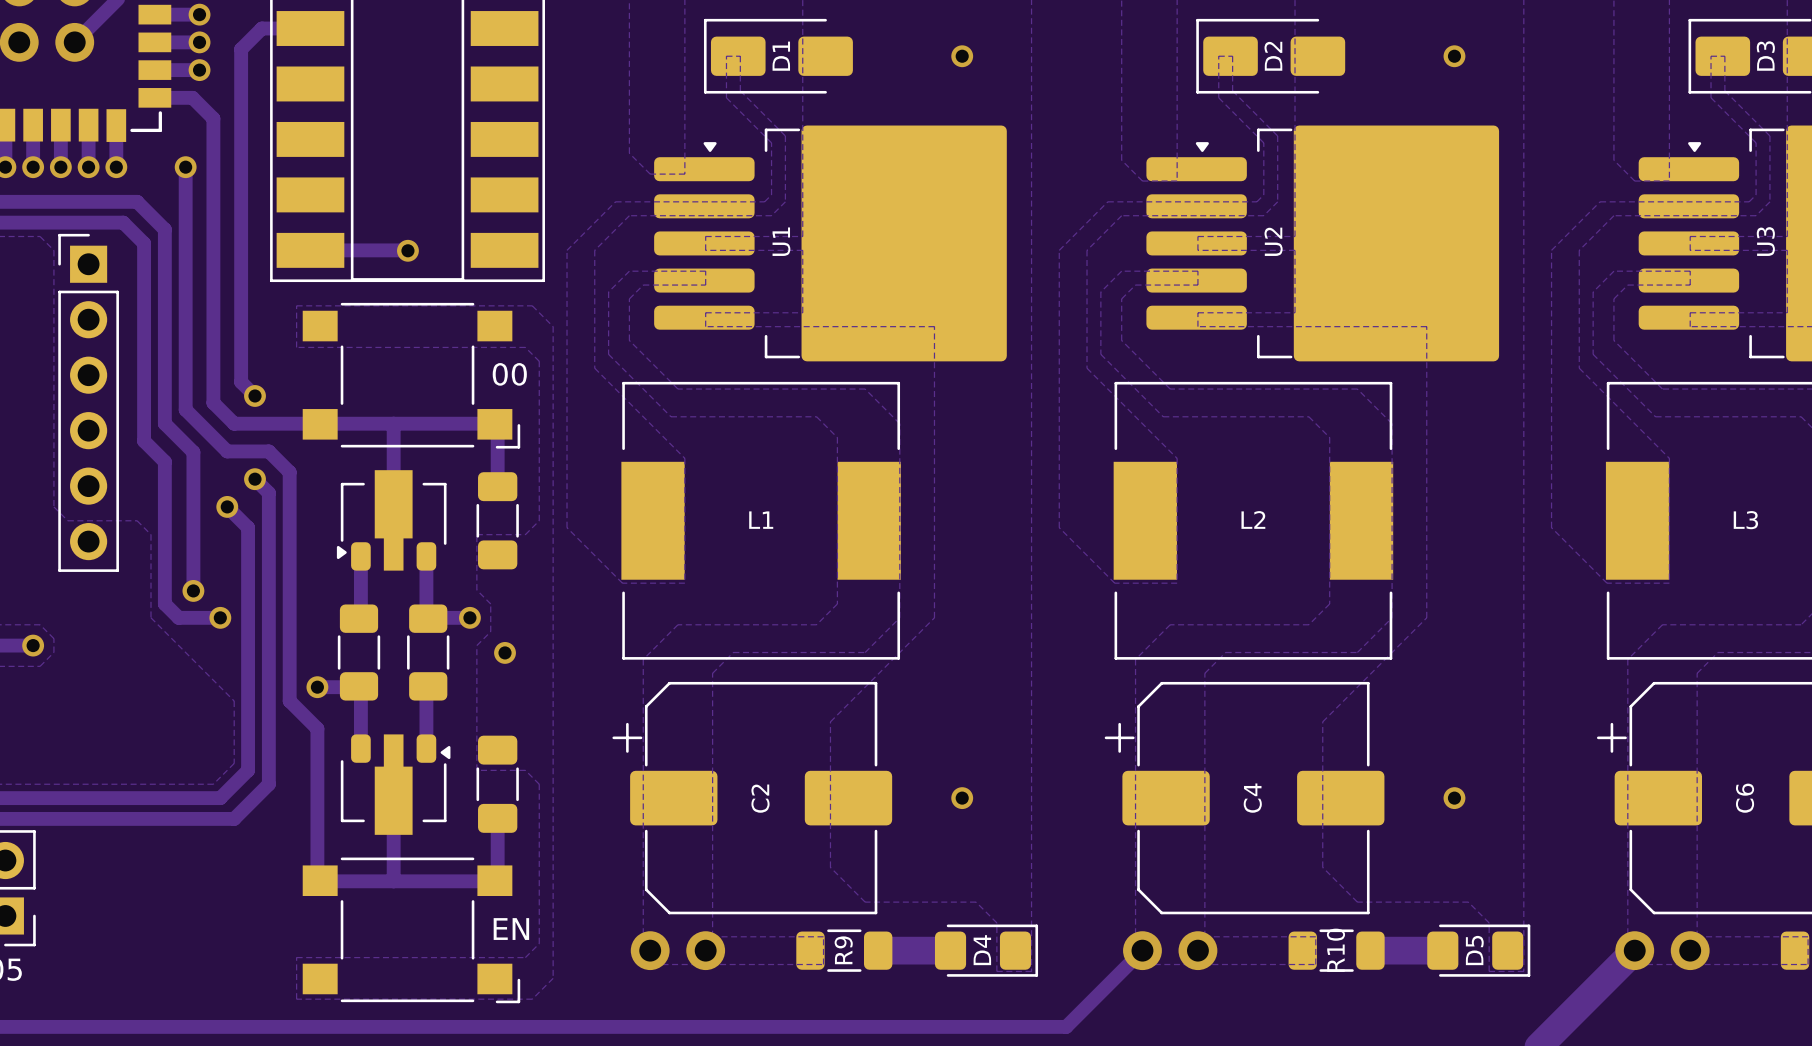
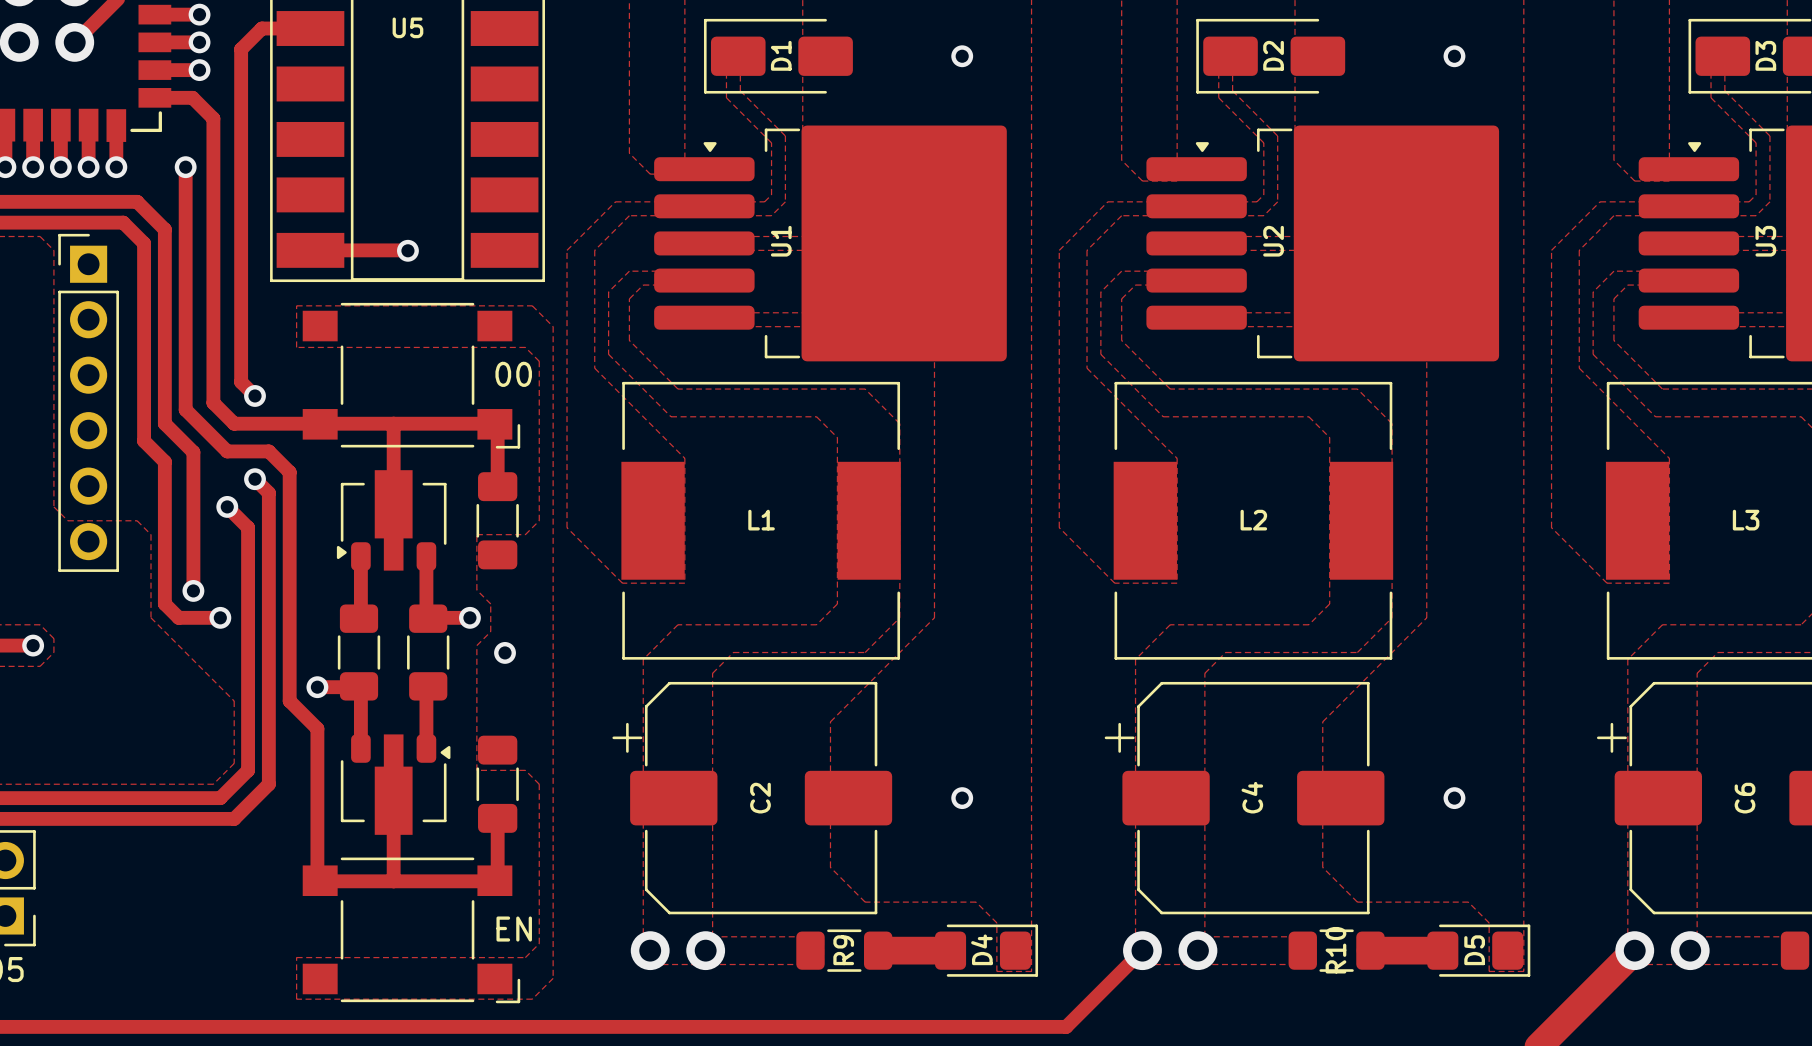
U5 name: none -> U5 (407, 27)

